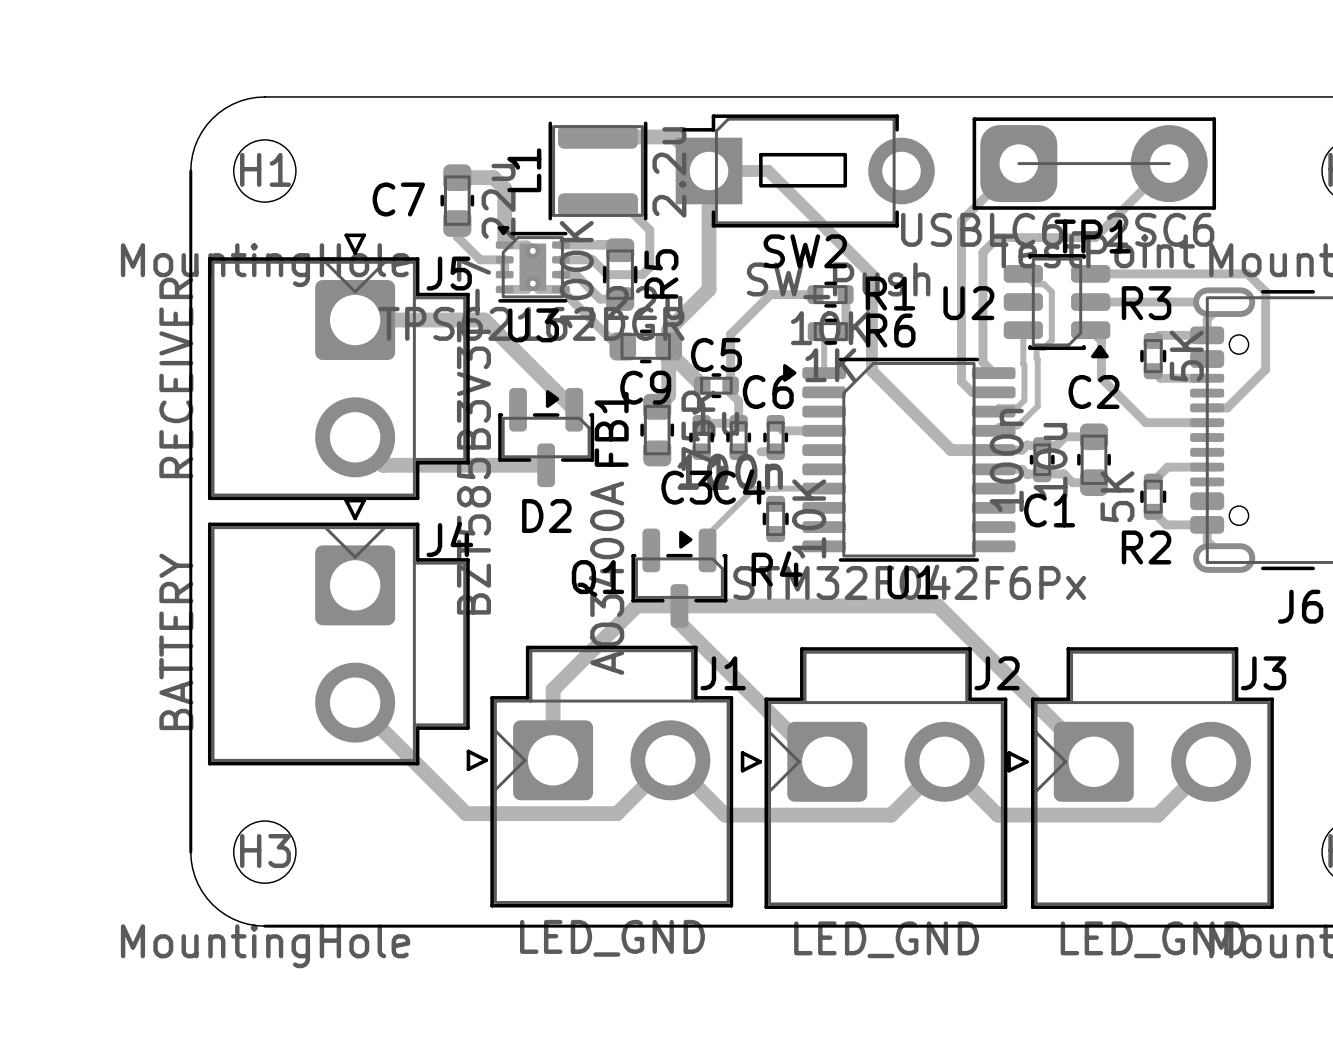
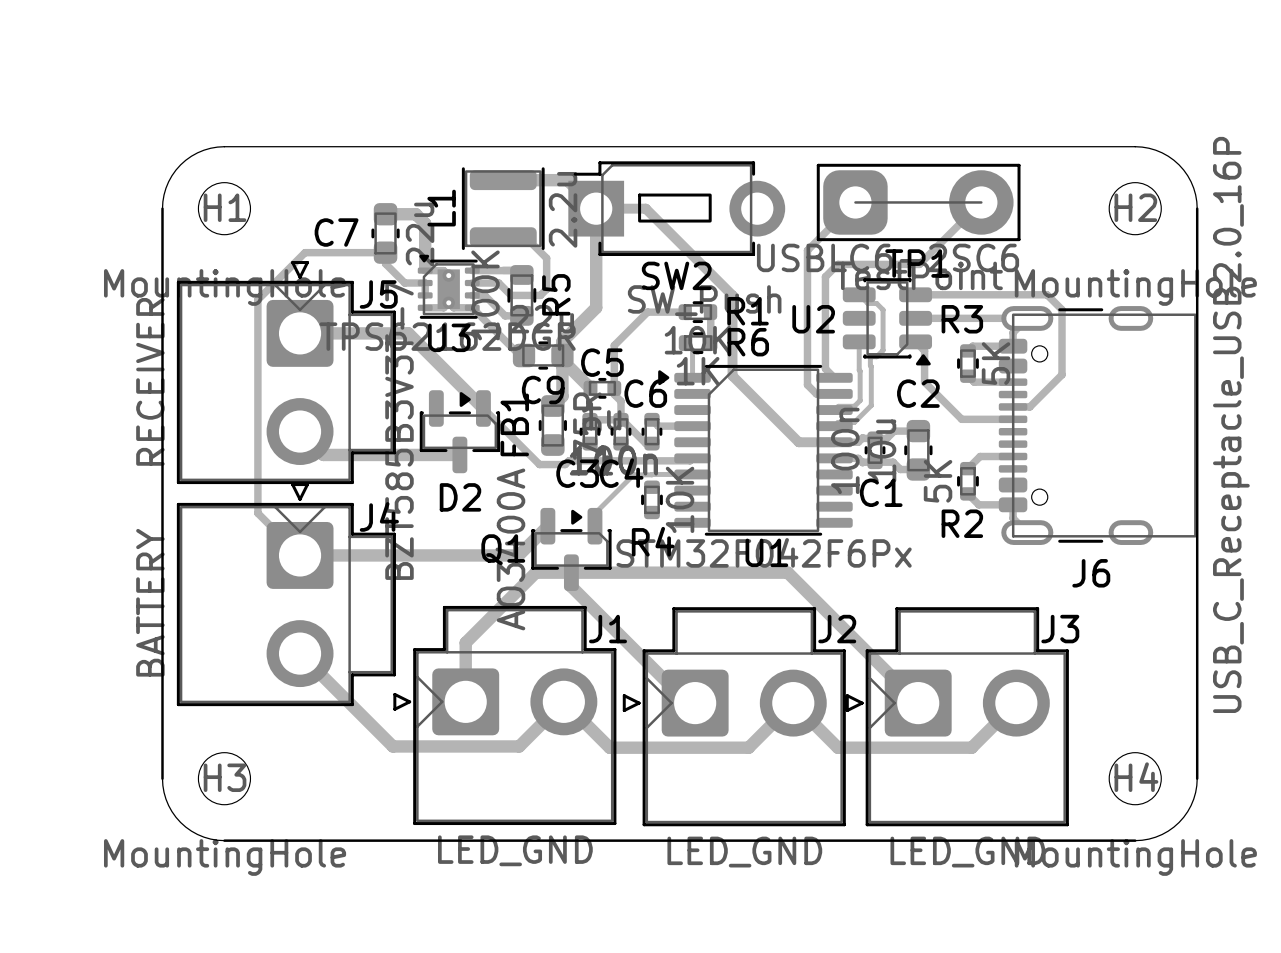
track: none -> (385, 252) (305, 252) (257, 299) (257, 513) (300, 555) (518, 555) (547, 526)
track: none -> (483, 408) (539, 464) (565, 464) (568, 460) (690, 460) (692, 458)
track: (761, 451) (768, 451) -> (620, 419) (645, 443)

